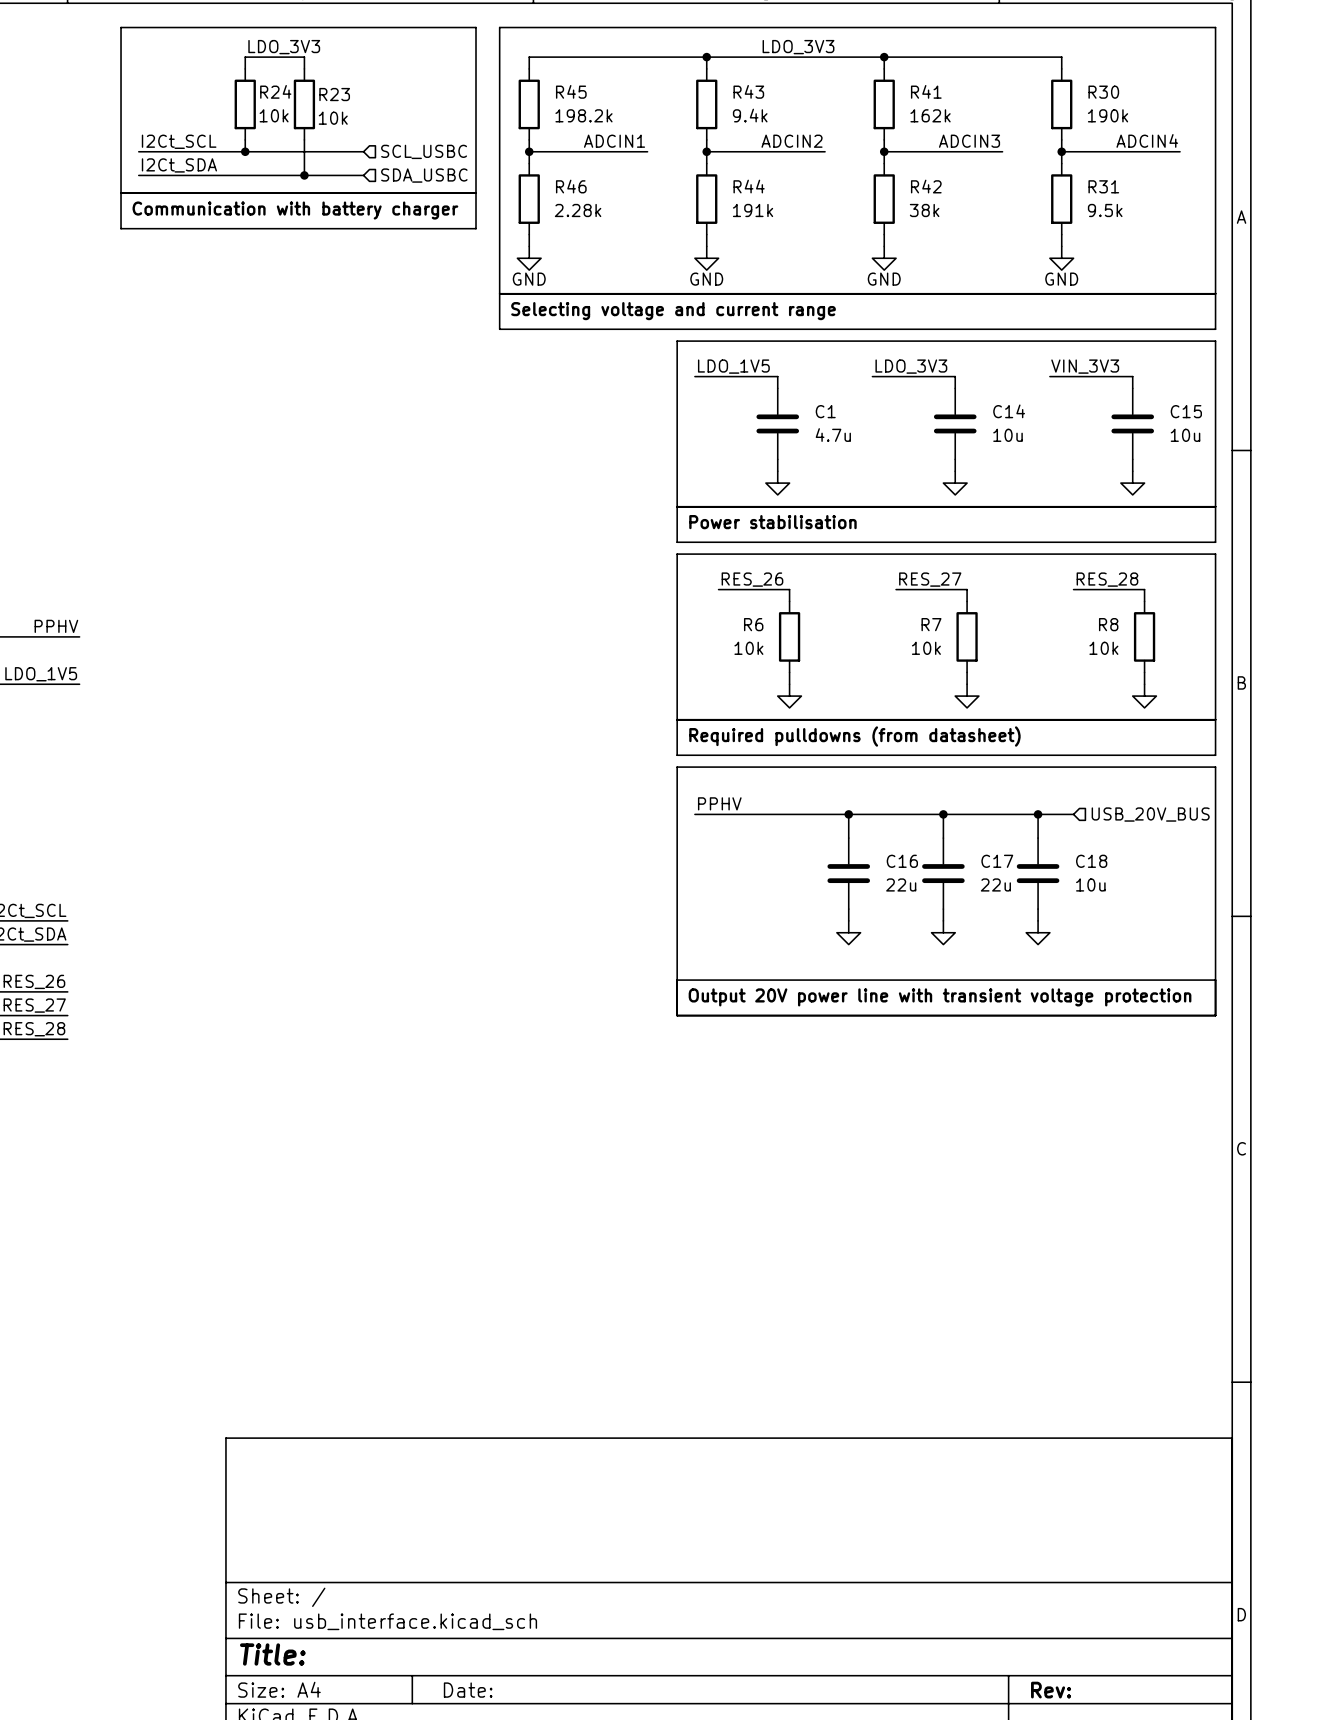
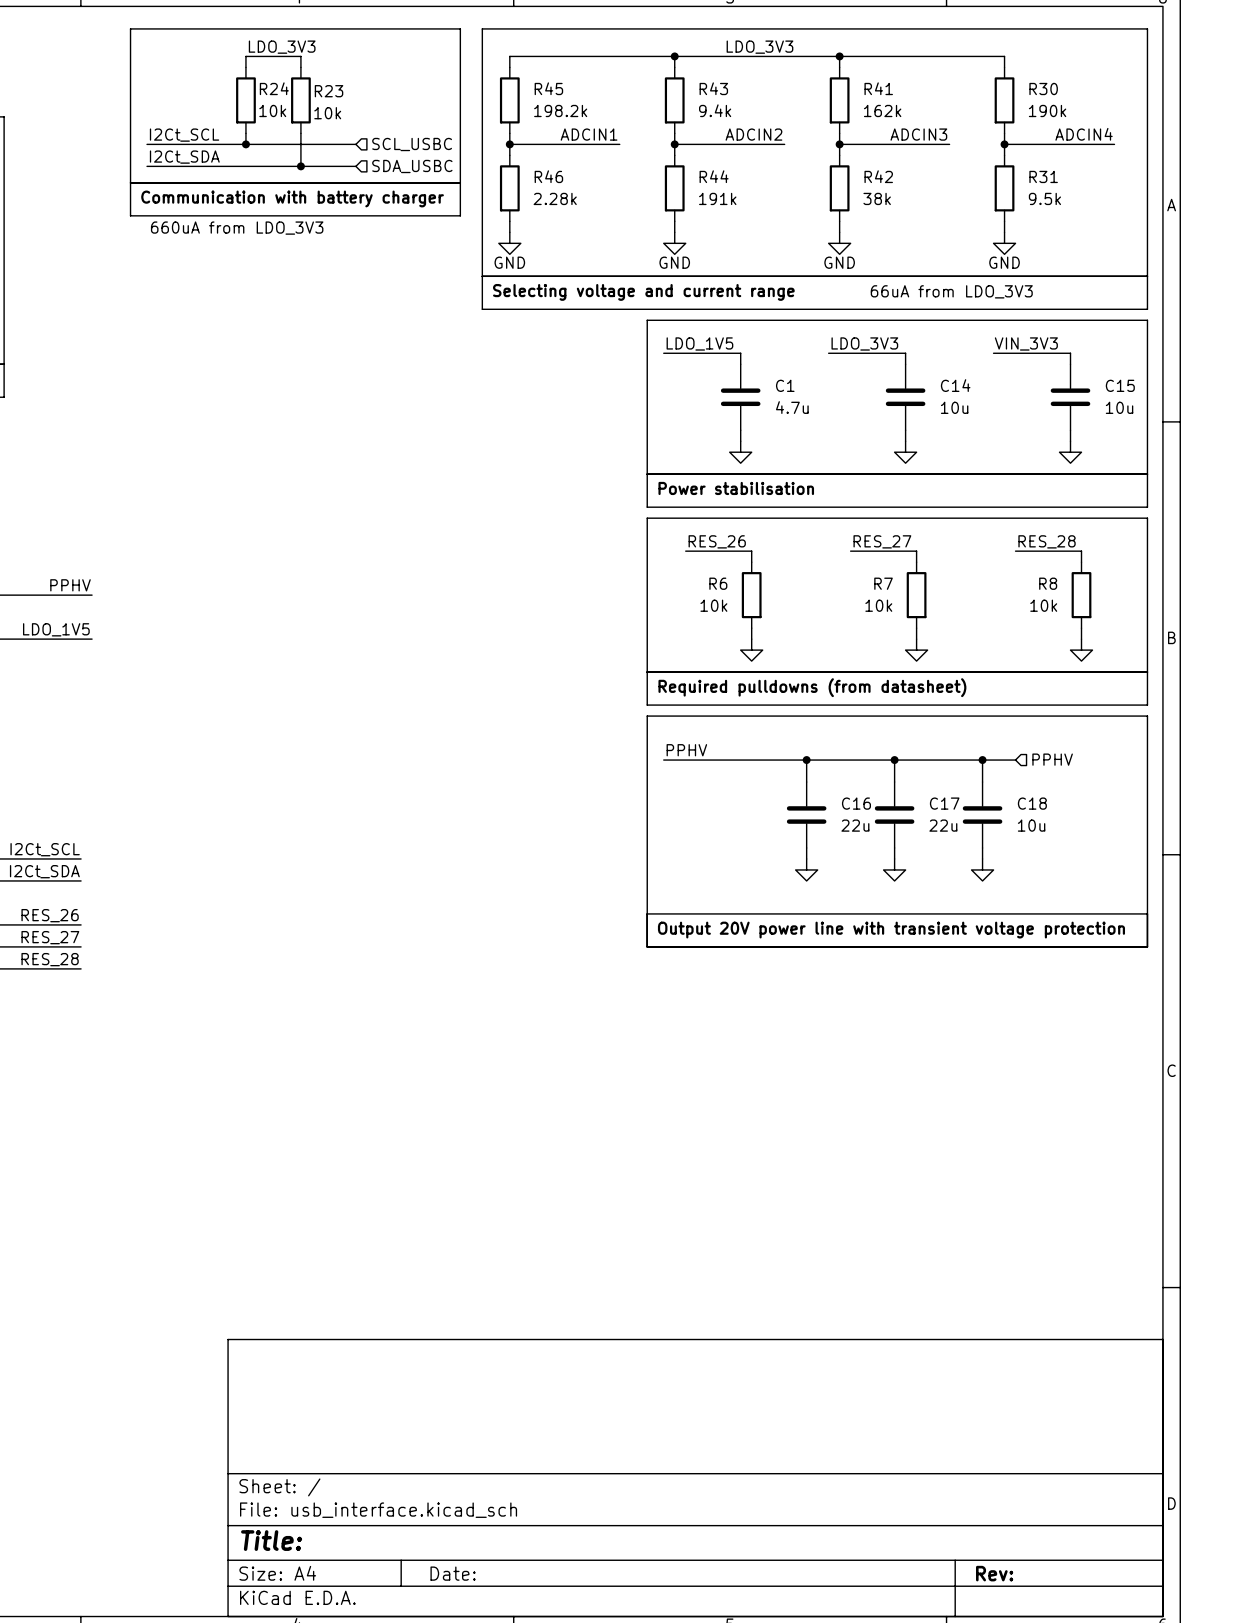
text: none -> 660uA from LDO_3V3 (237, 228)
text: none -> 66uA from LDO_3V3 (951, 291)
hierarchical label: USB_20V_BUS (1150, 814) -> PPHV (1052, 759)

